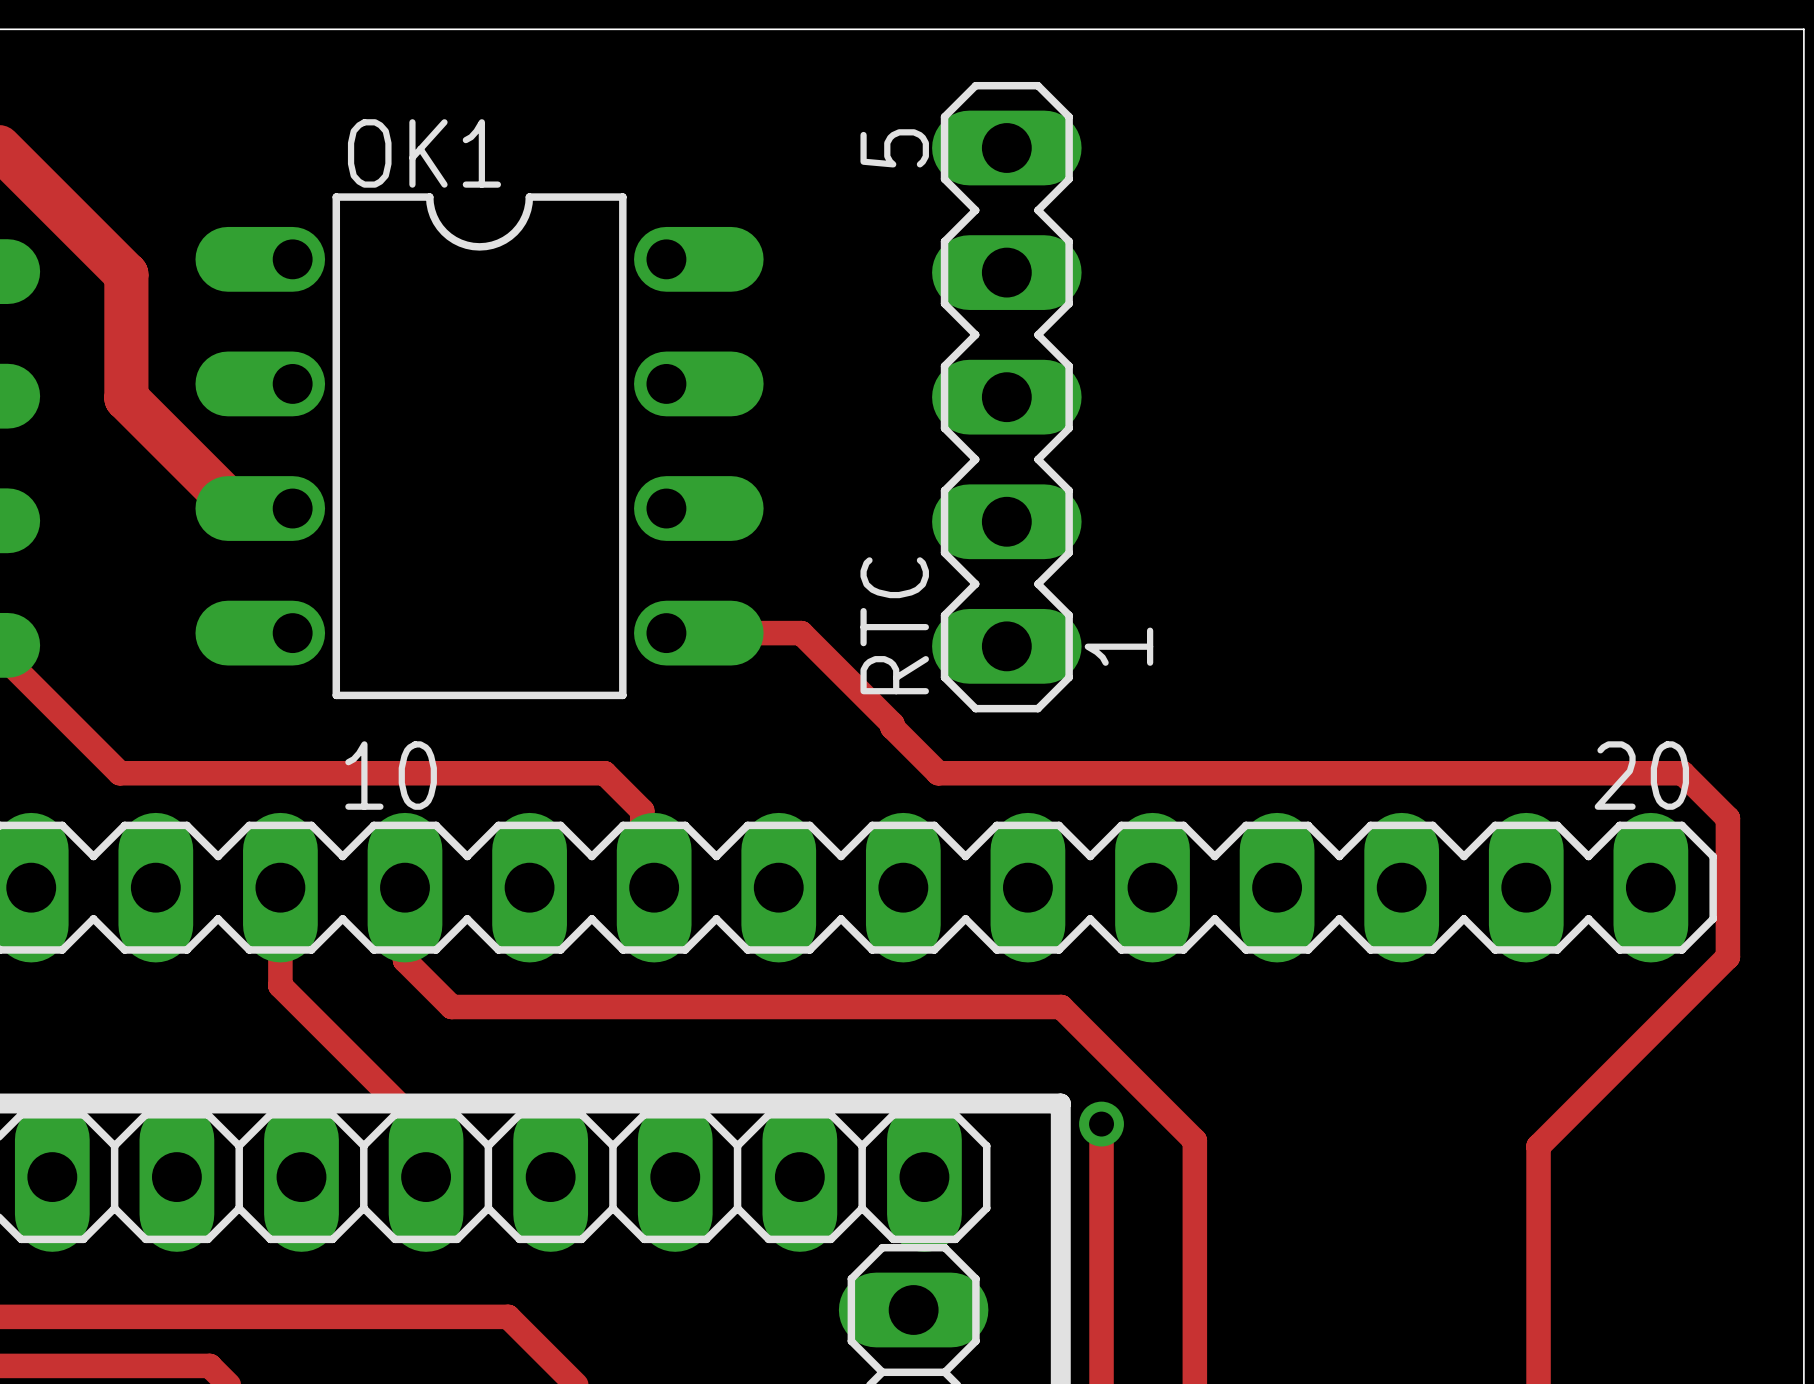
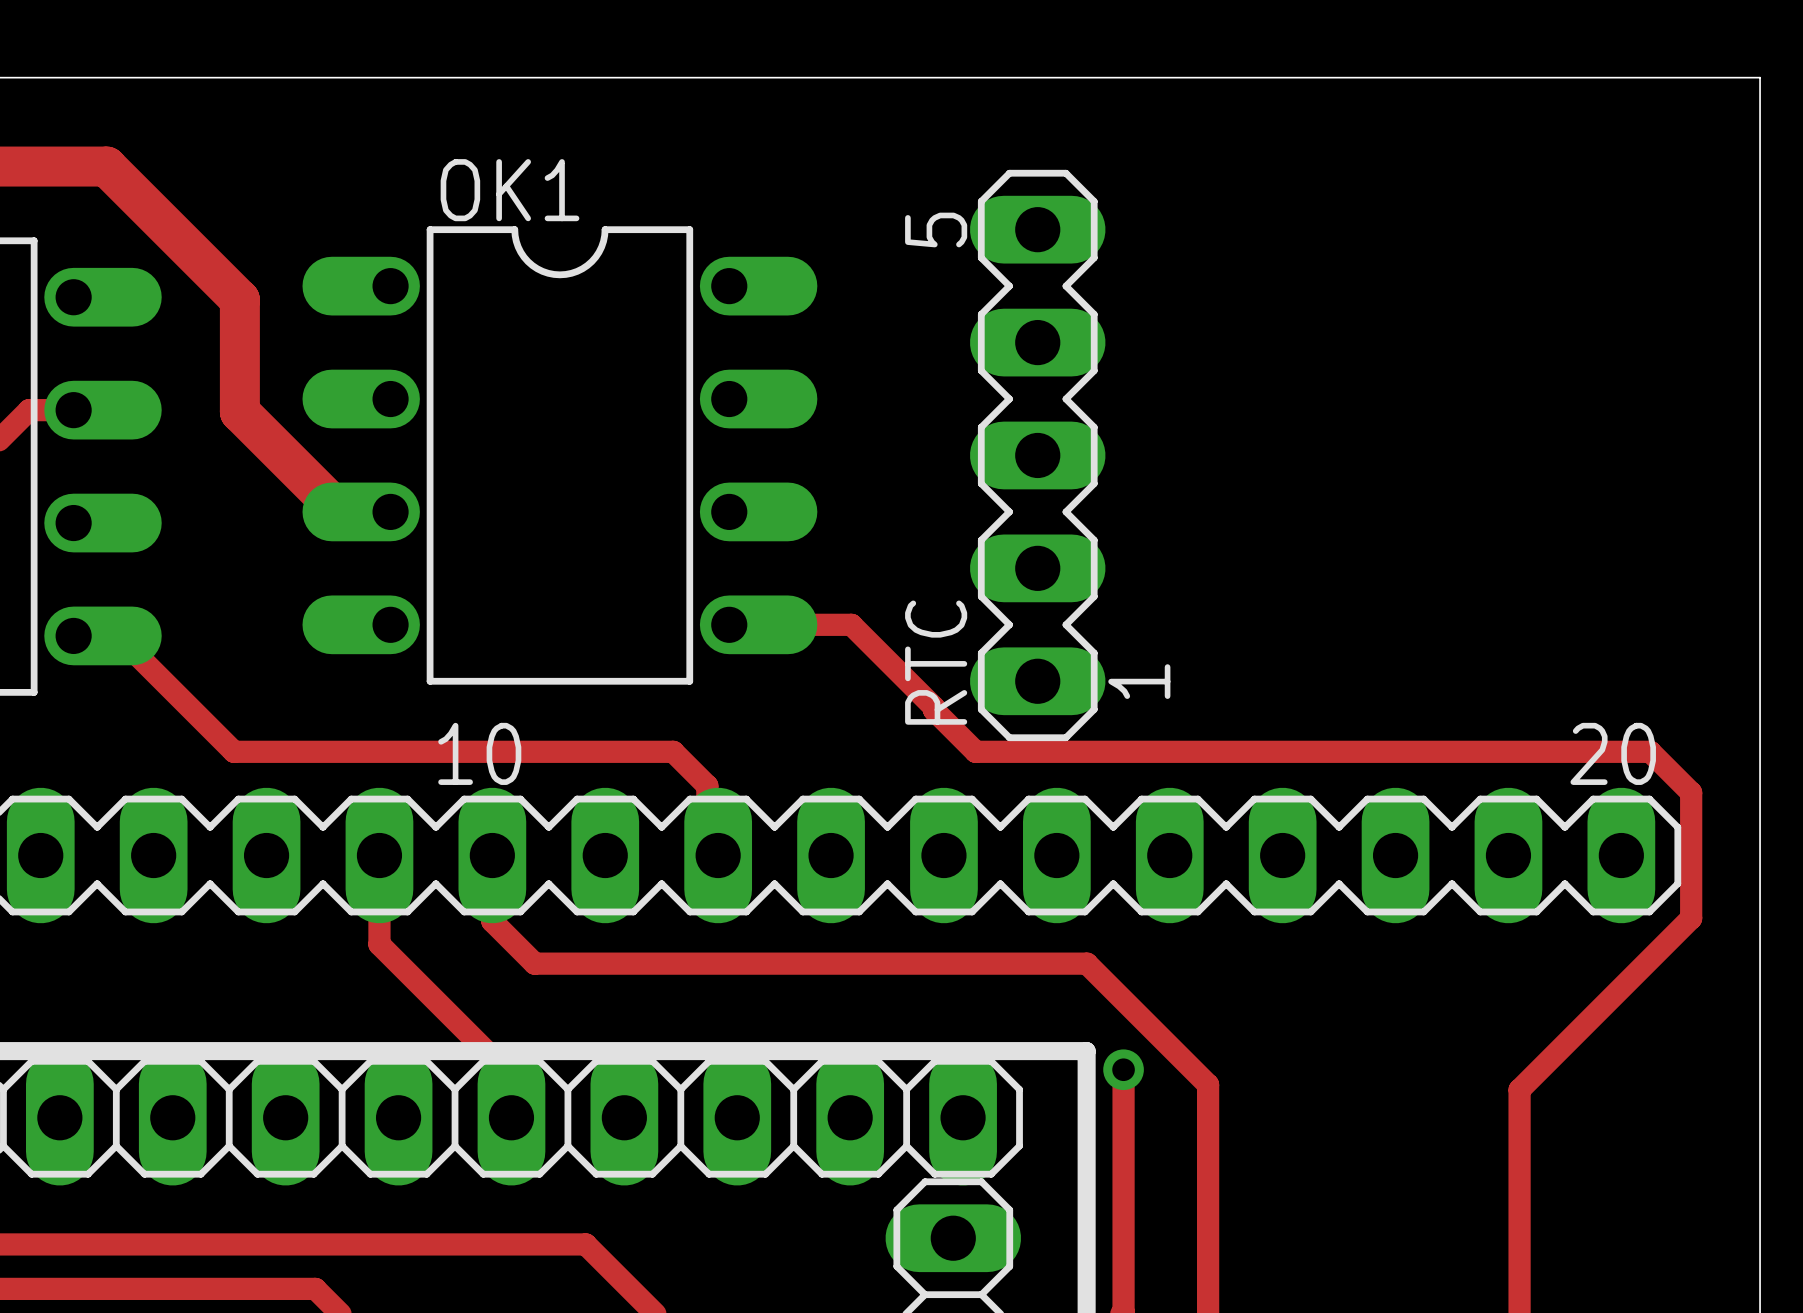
RTC position: (1006, 397) -> (1037, 455)

